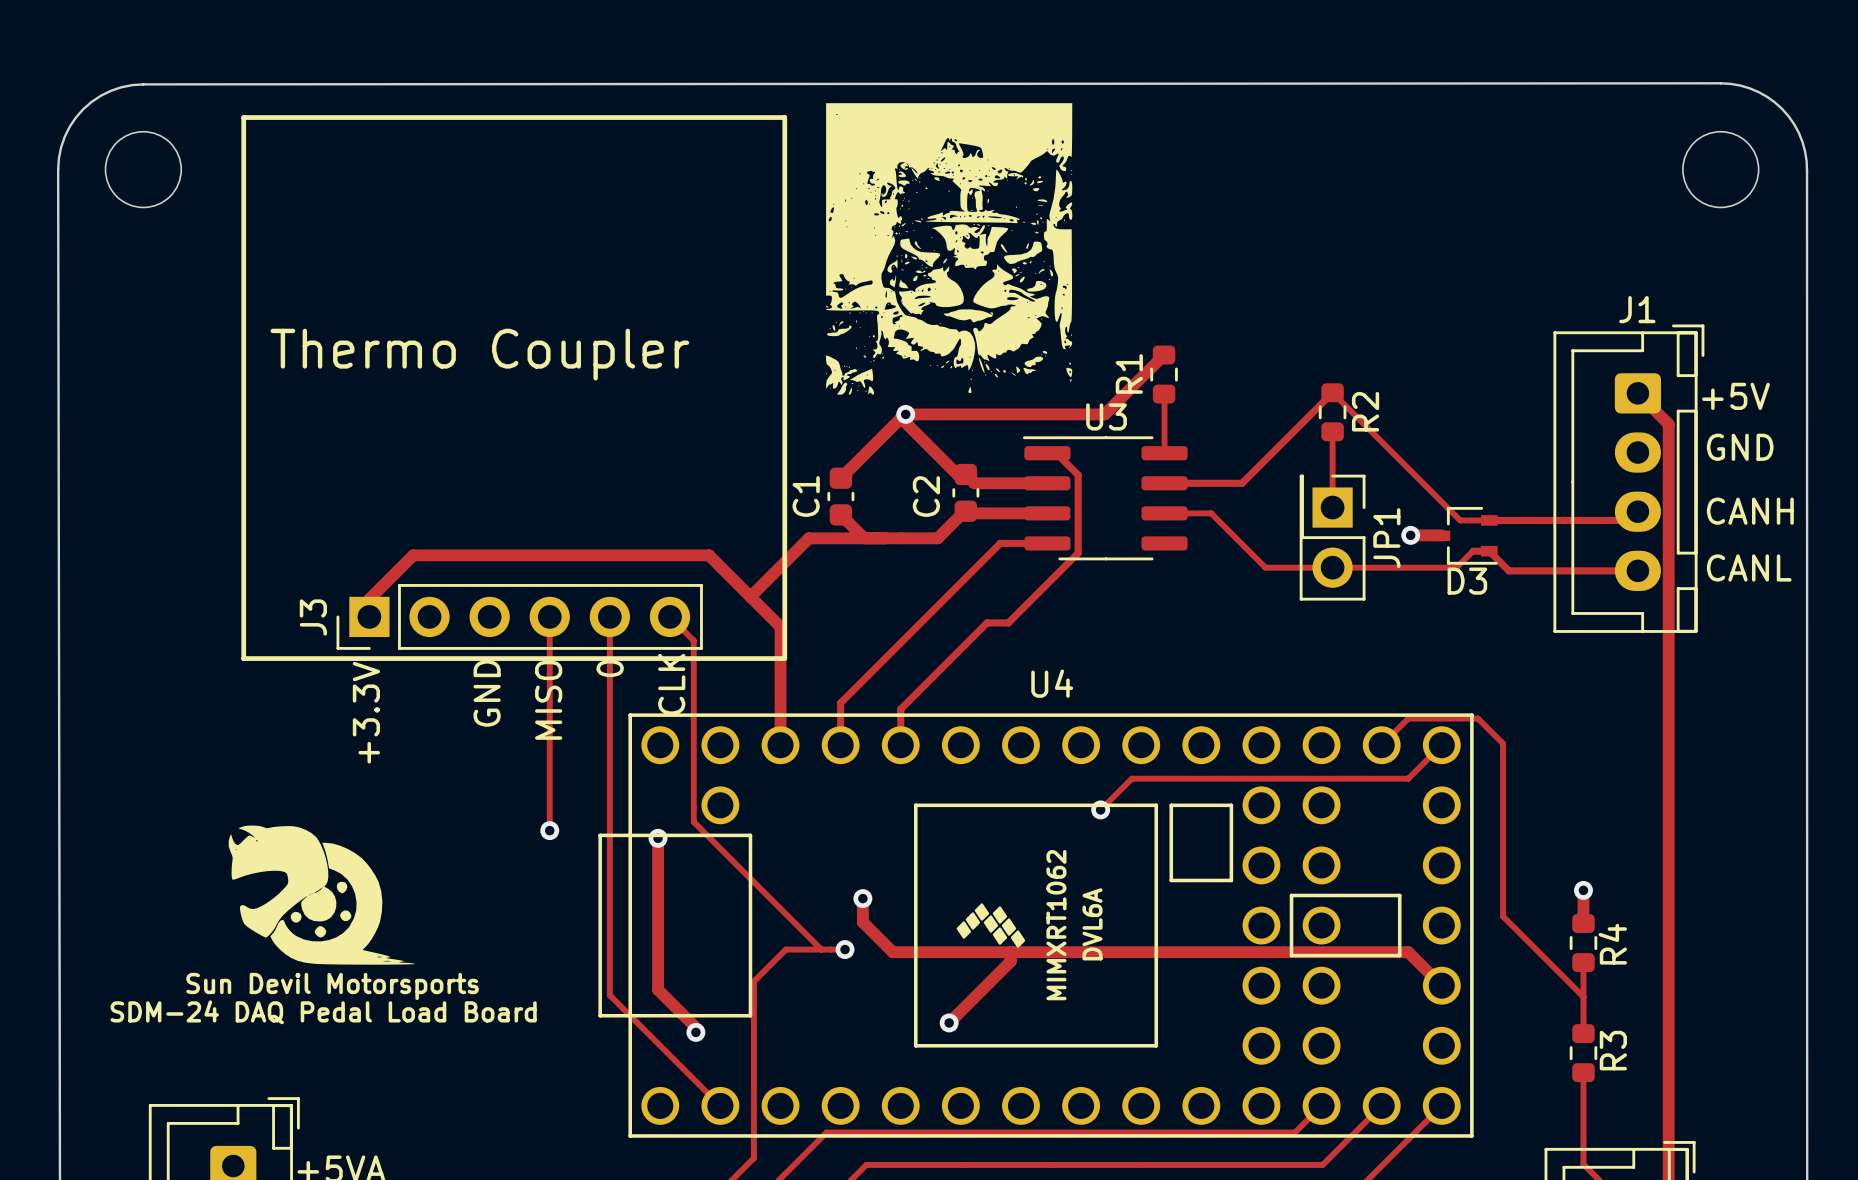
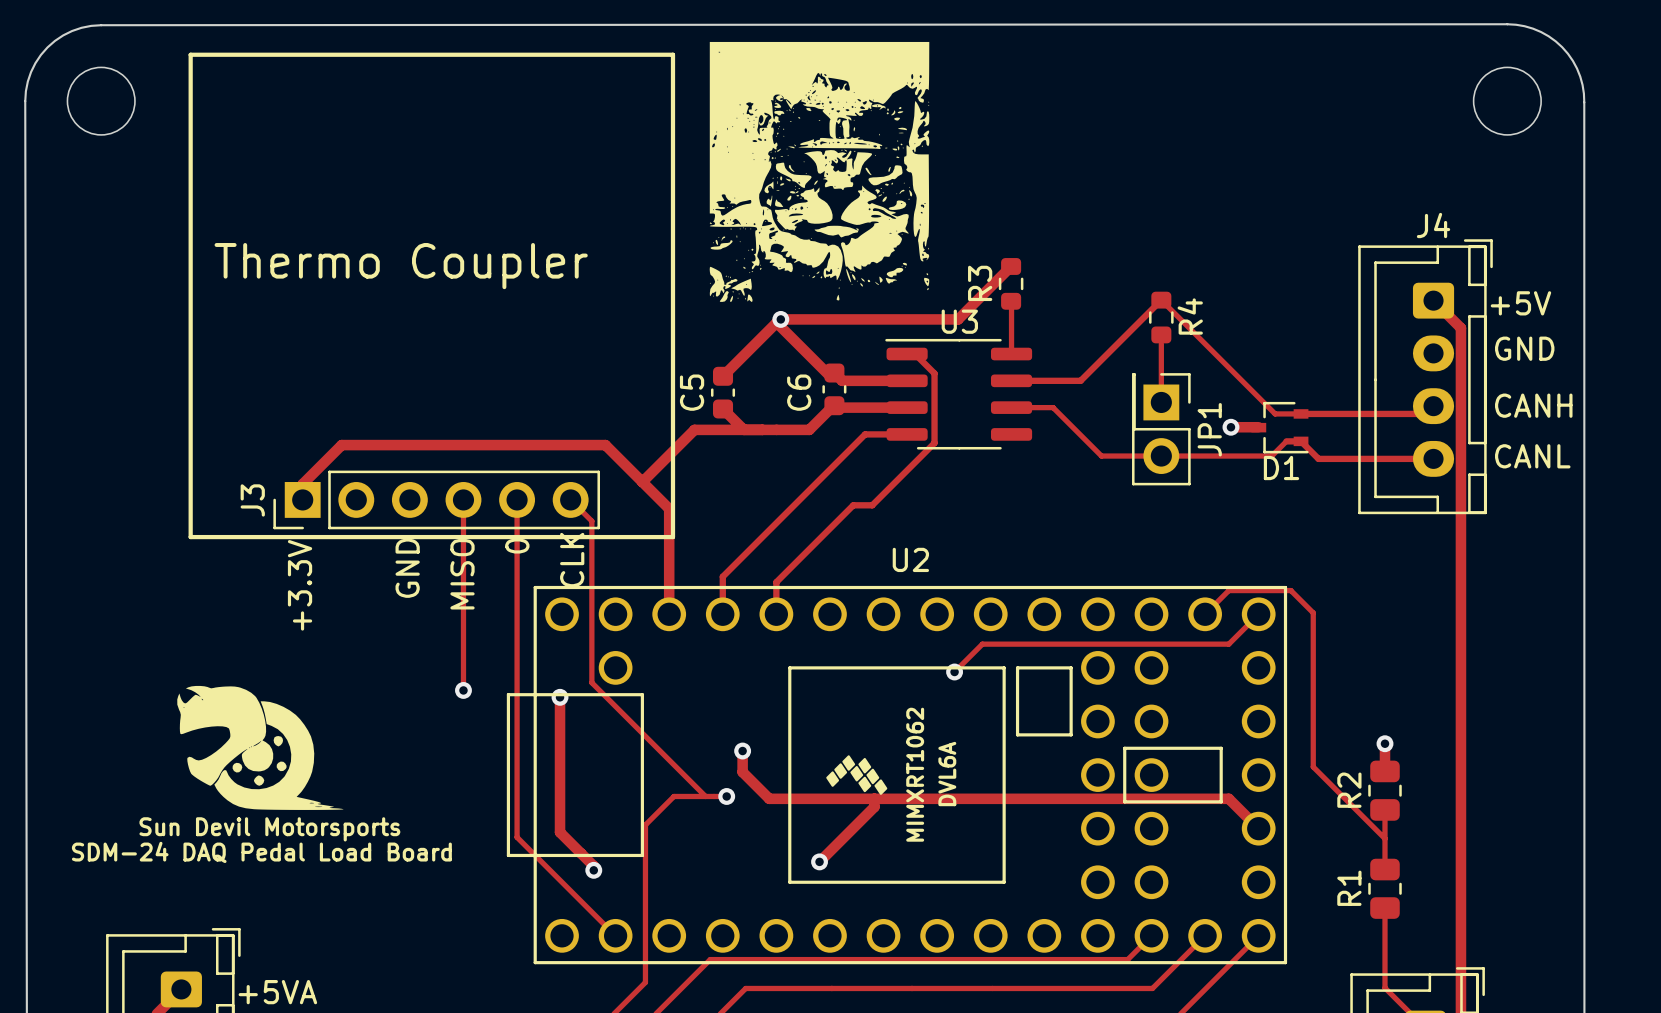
J1 name: J1 (1637, 309) -> J4 (1433, 225)
R1 name: R1 (1129, 373) -> R3 (980, 283)
R2 name: R2 (1365, 411) -> R4 (1190, 316)
C1 name: C1 (806, 496) -> C5 (692, 392)
C2 name: C2 (926, 496) -> C6 (799, 392)
D3 name: D3 (1467, 581) -> D1 (1281, 468)
U4 name: U4 (1052, 683) -> U2 (910, 559)
R4: (1583, 943) -> none
R2: none -> (1384, 790)
R3: (1583, 1053) -> none
R1: none -> (1384, 888)

